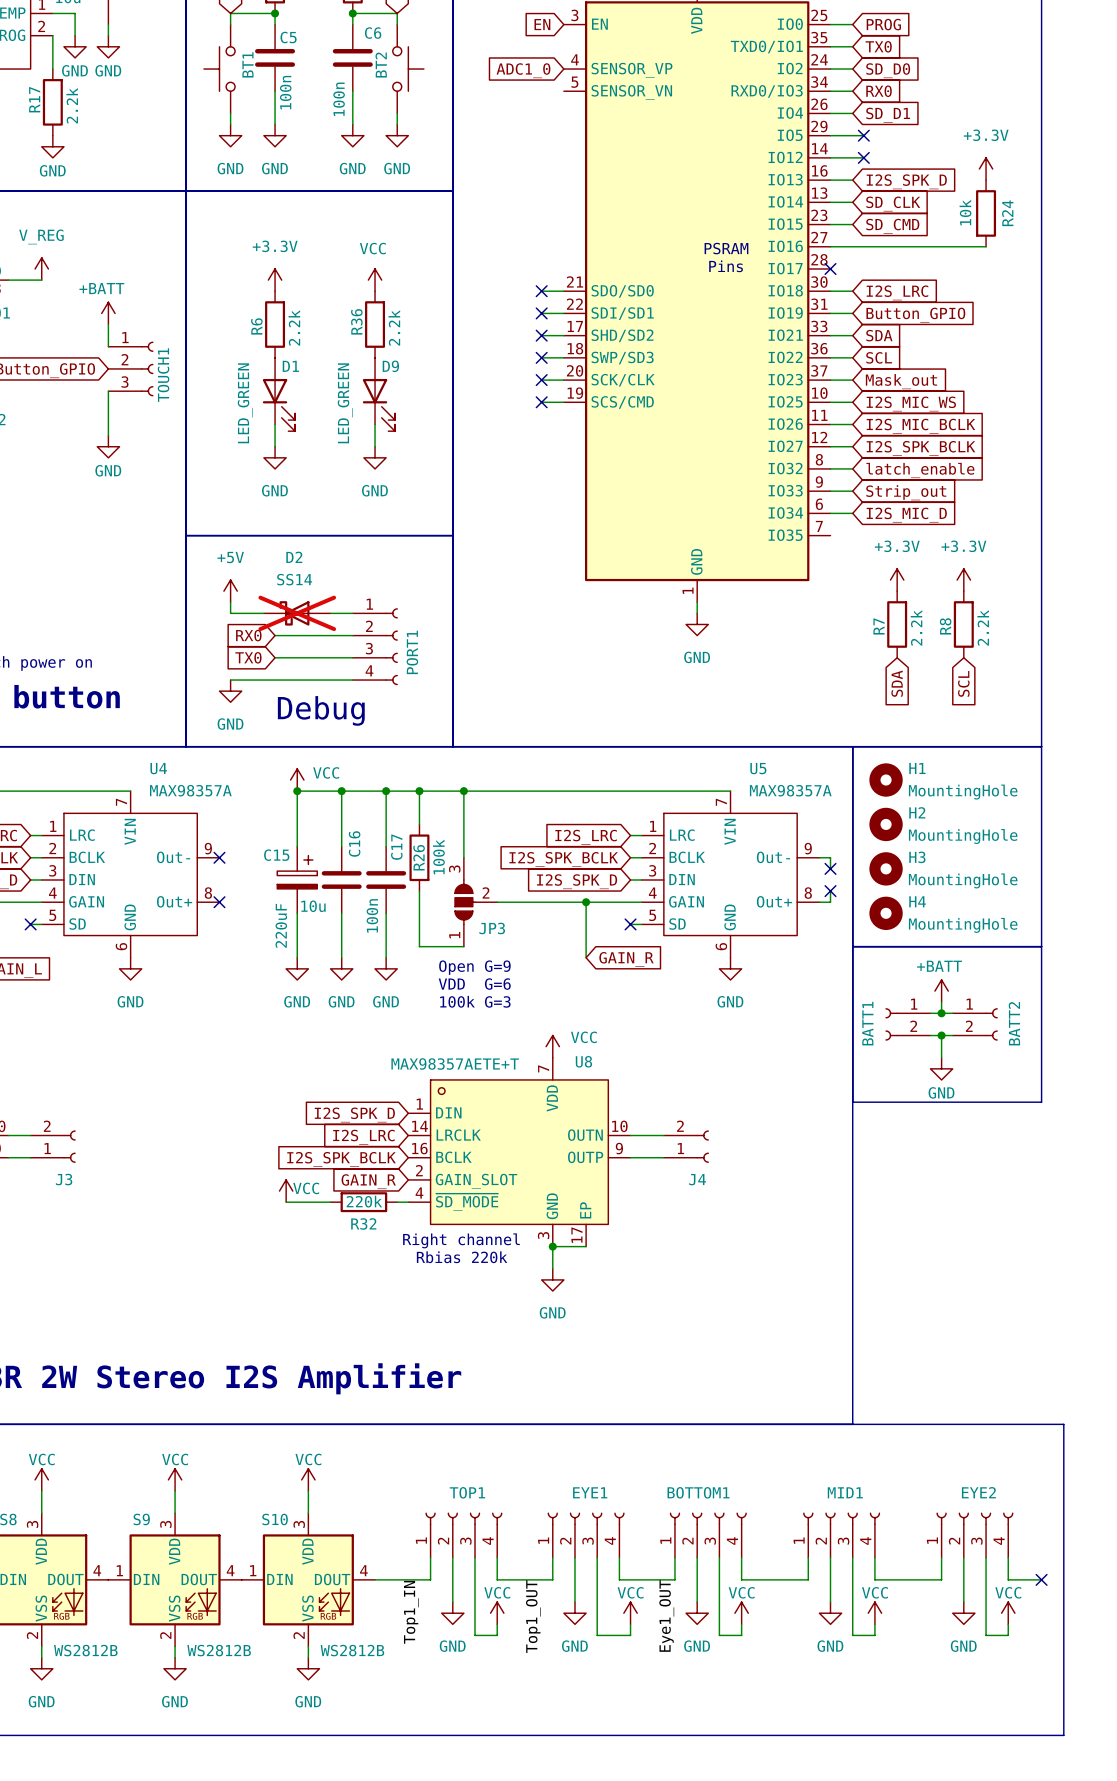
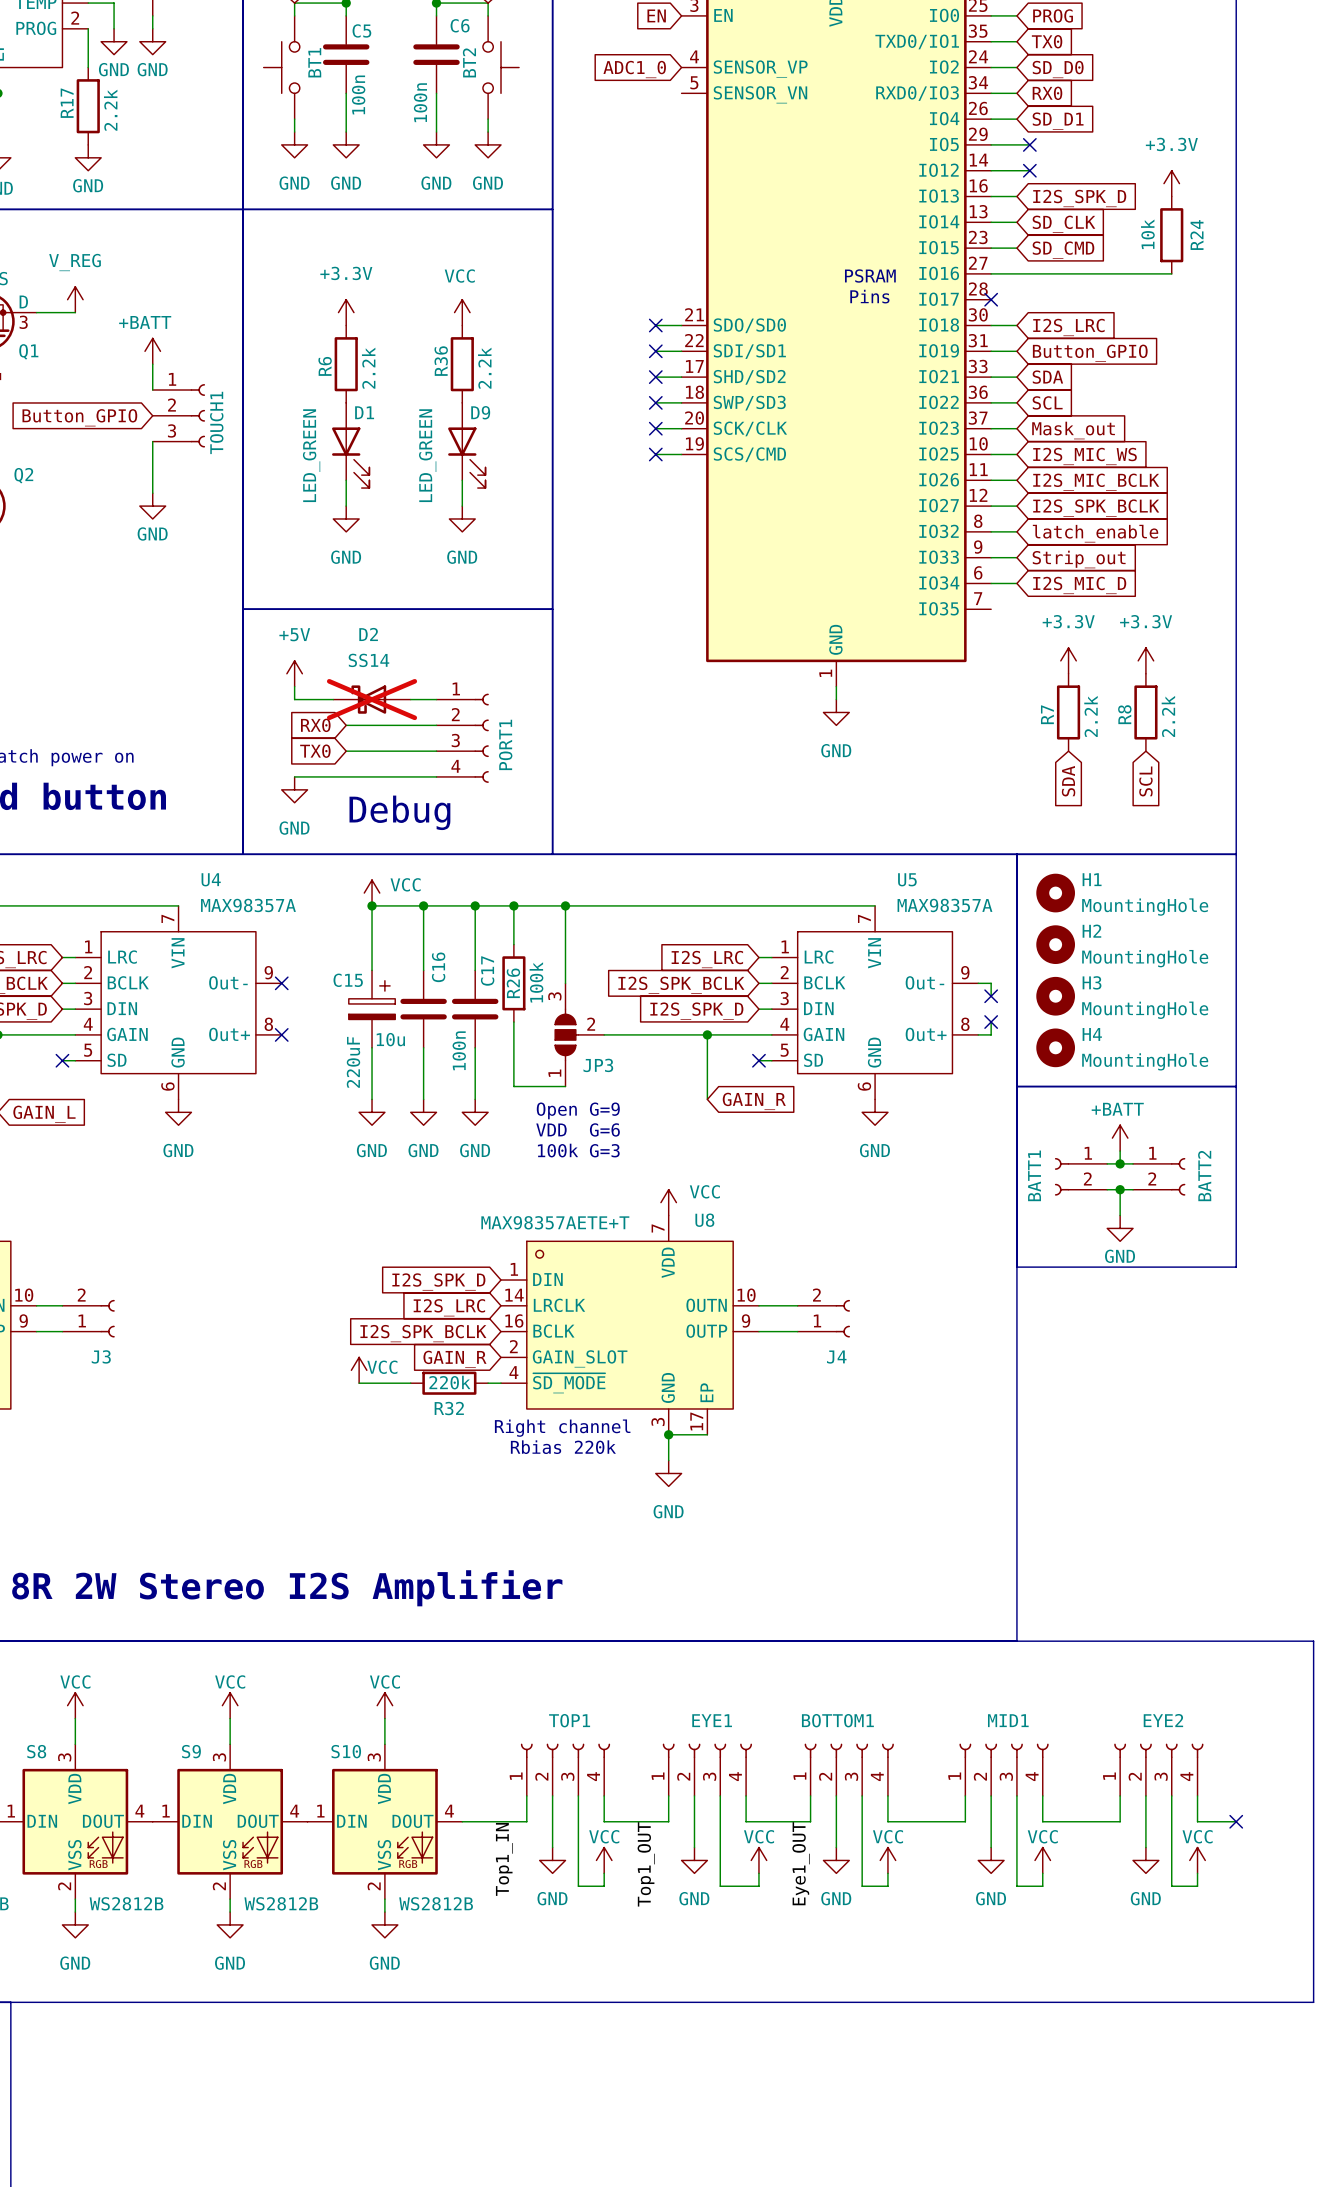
line: (1063, 1424) (1063, 1735) -> (1262, 1641) (1313, 1641) (1313, 2002) (1262, 2002)

